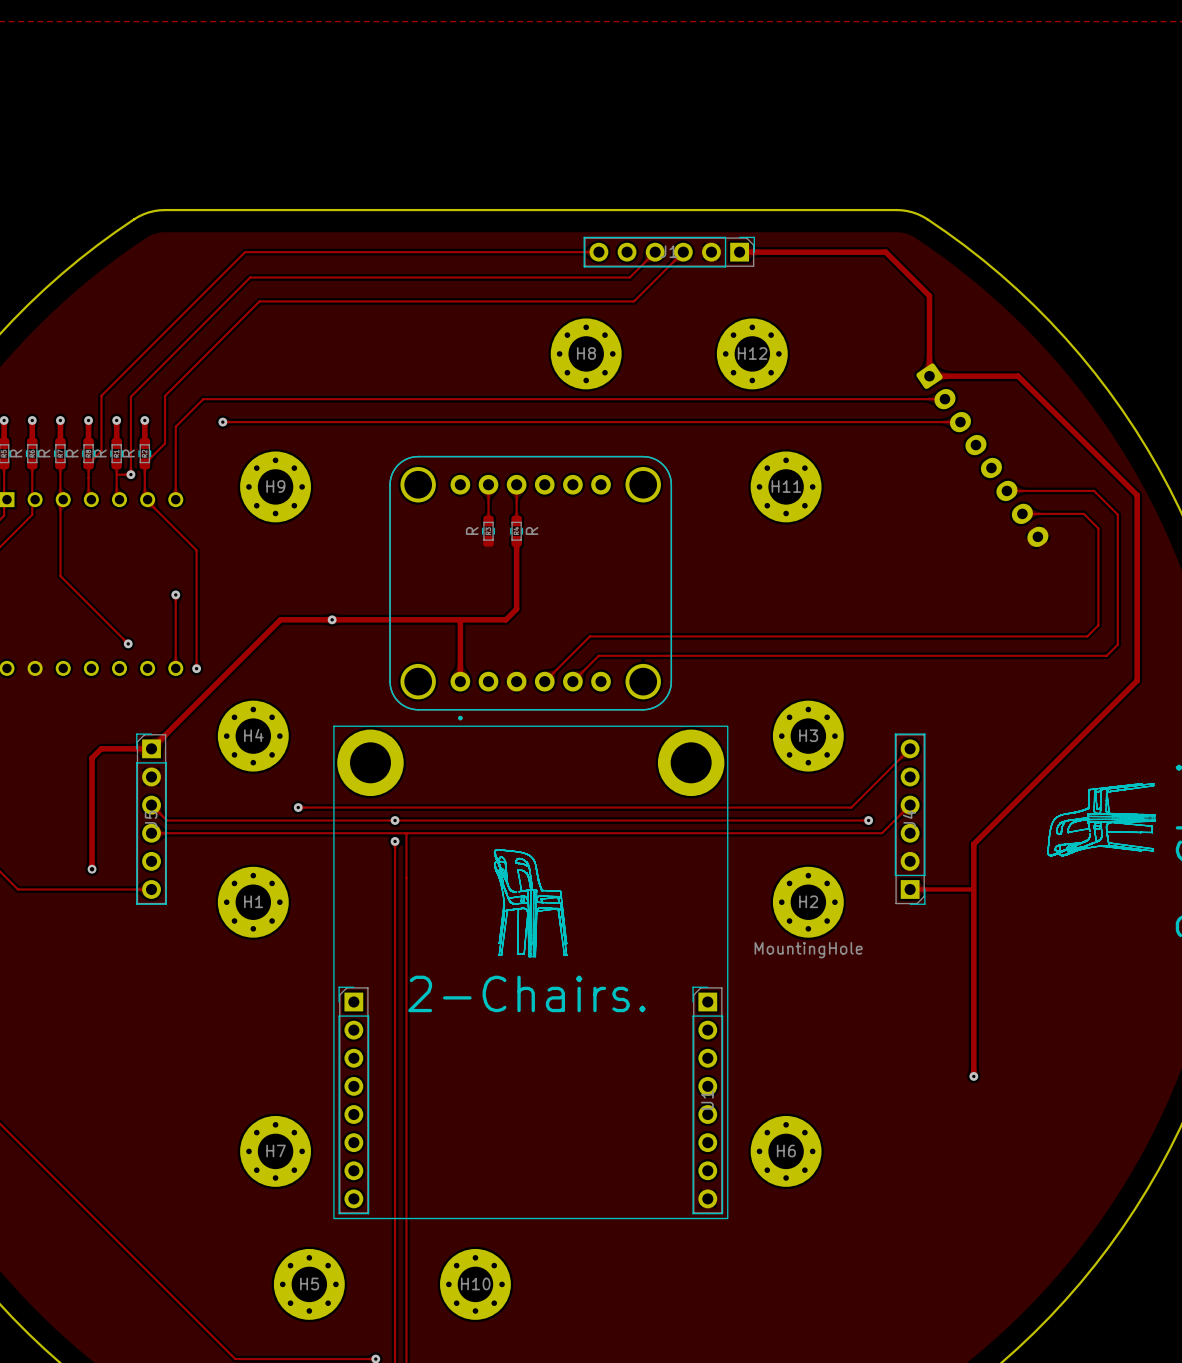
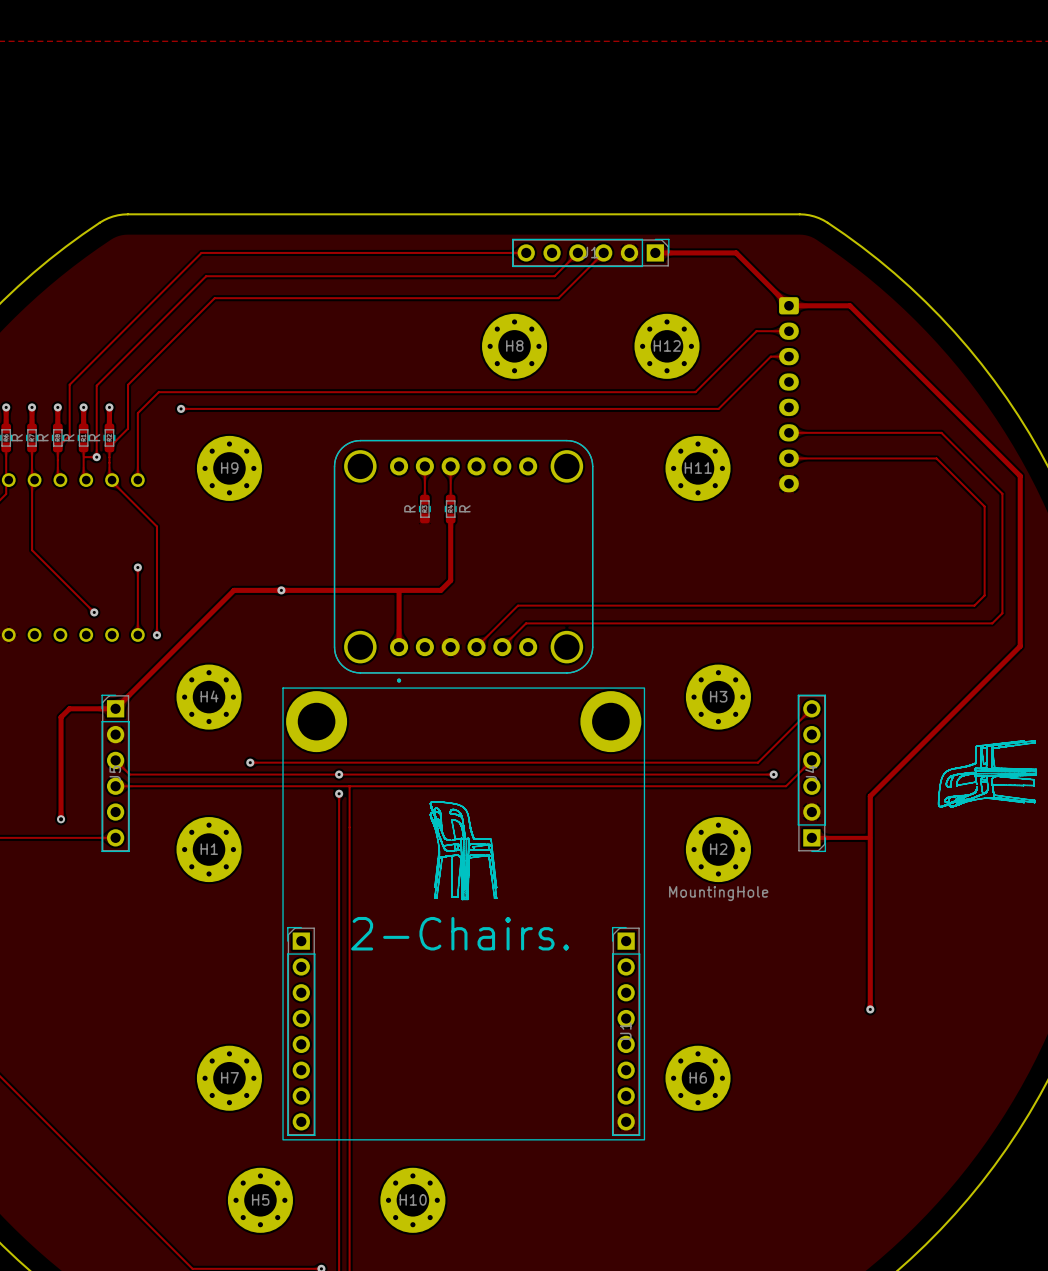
track: (827, 252) (885, 252) (929, 295) (929, 376) (1018, 376) -> (736, 252) (788, 305) (849, 305) (910, 366)
track: (945, 399) (203, 399) (198, 403) -> (788, 331) (756, 331) (695, 392) (158, 392)
part: none -> (788, 394)
track: (808, 422) (960, 422) -> (718, 408) (770, 356) (788, 356)
part: (982, 455) -> none
track: (1006, 490) (1094, 490) -> (788, 432) (941, 432) (980, 472)
track: (1022, 513) (1083, 513) -> (788, 458) (936, 458) (971, 493)

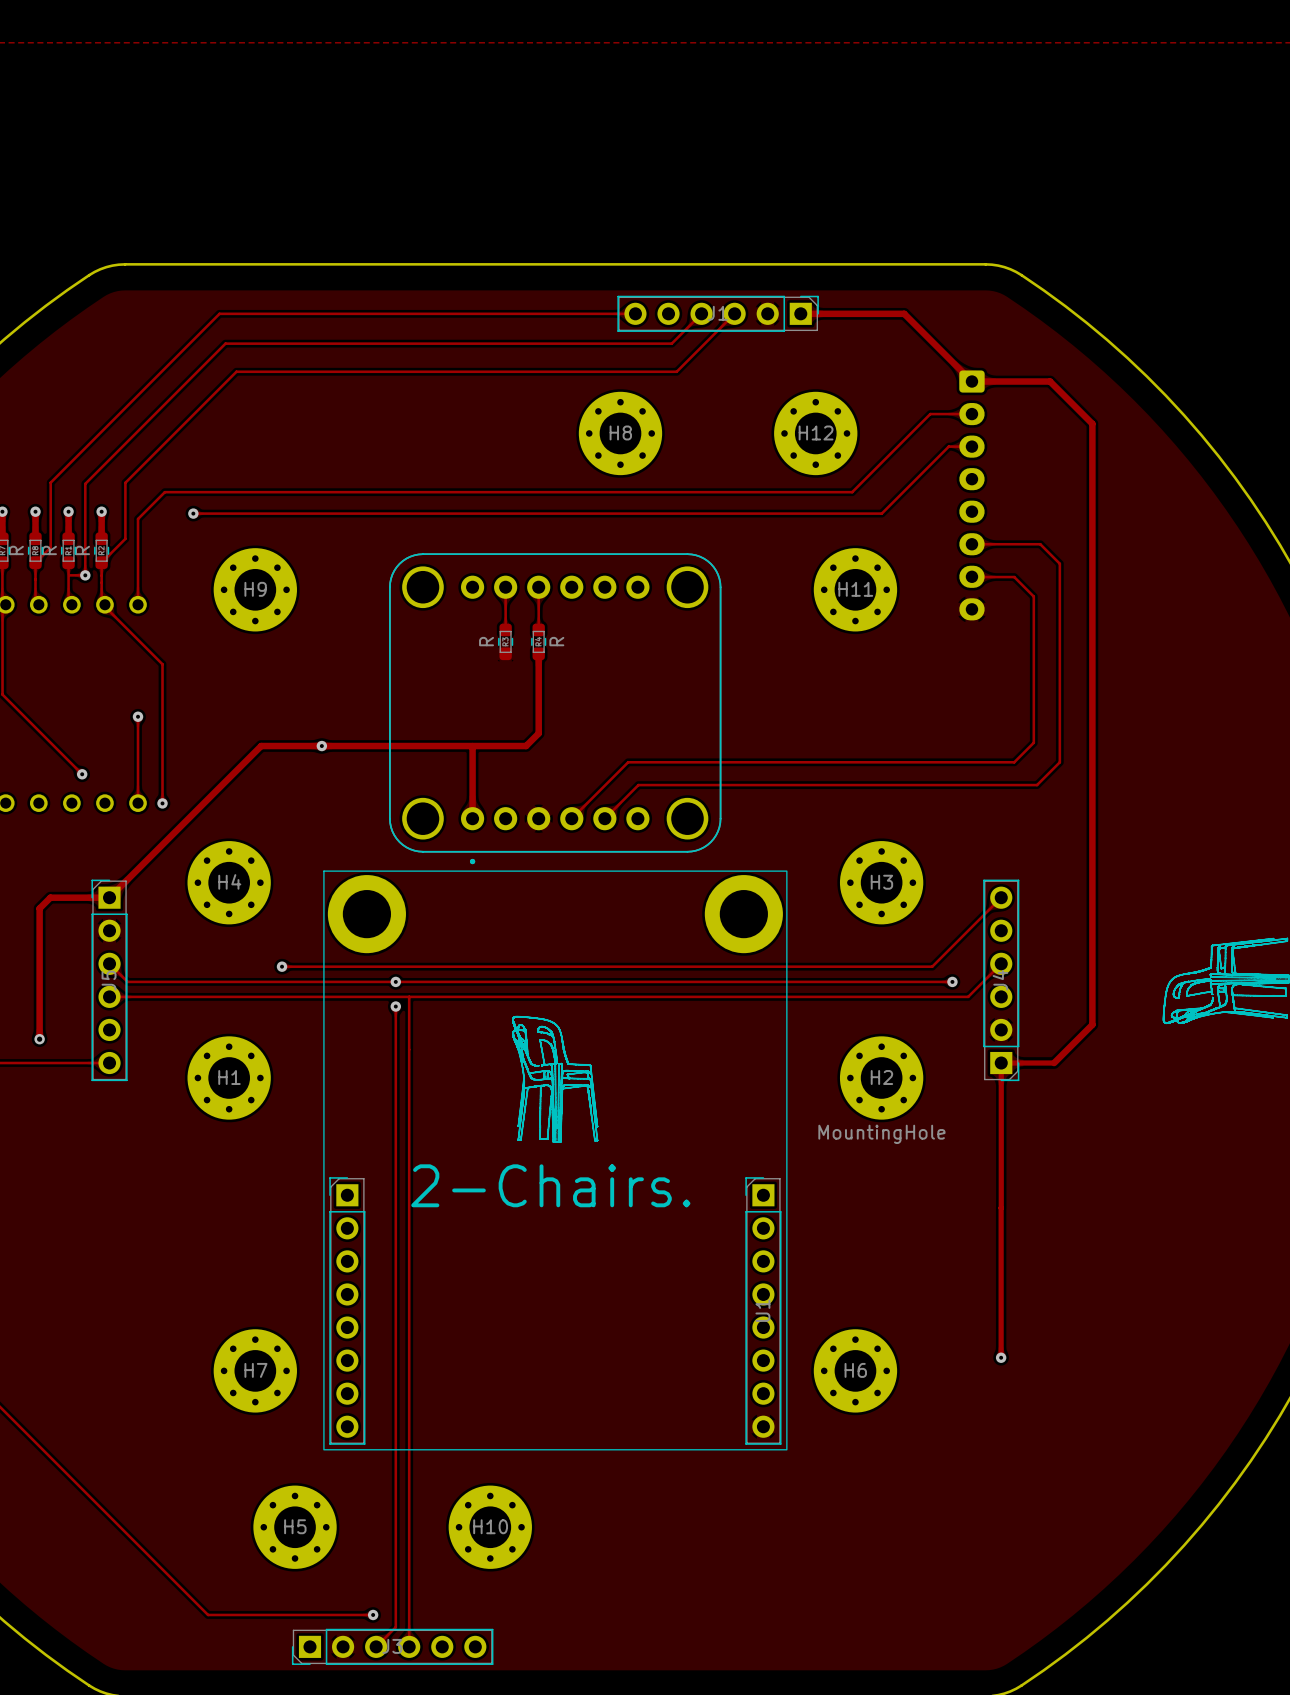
track: (882, 338) (1020, 476) (1020, 646) (870, 796) (870, 1009) -> (1092, 423) (1092, 1024) (1054, 1063)
track: (842, 432) (941, 432) (1002, 493) (1002, 613) (992, 623) (526, 623) -> (1040, 544) (1059, 563) (1059, 762) (1037, 785) (638, 785) (635, 788)
track: (822, 458) (936, 458) (984, 506) (984, 595) (974, 605) (518, 605) -> (1014, 577) (1033, 596) (1033, 742) (1014, 762) (628, 762) (624, 765)
track: none -> (1001, 1063) (1001, 1207)
track: (853, 837) (870, 837) -> none
track: none -> (1001, 1208) (1001, 1357)
via: (870, 1009) -> none
via: none -> (1001, 1357)

